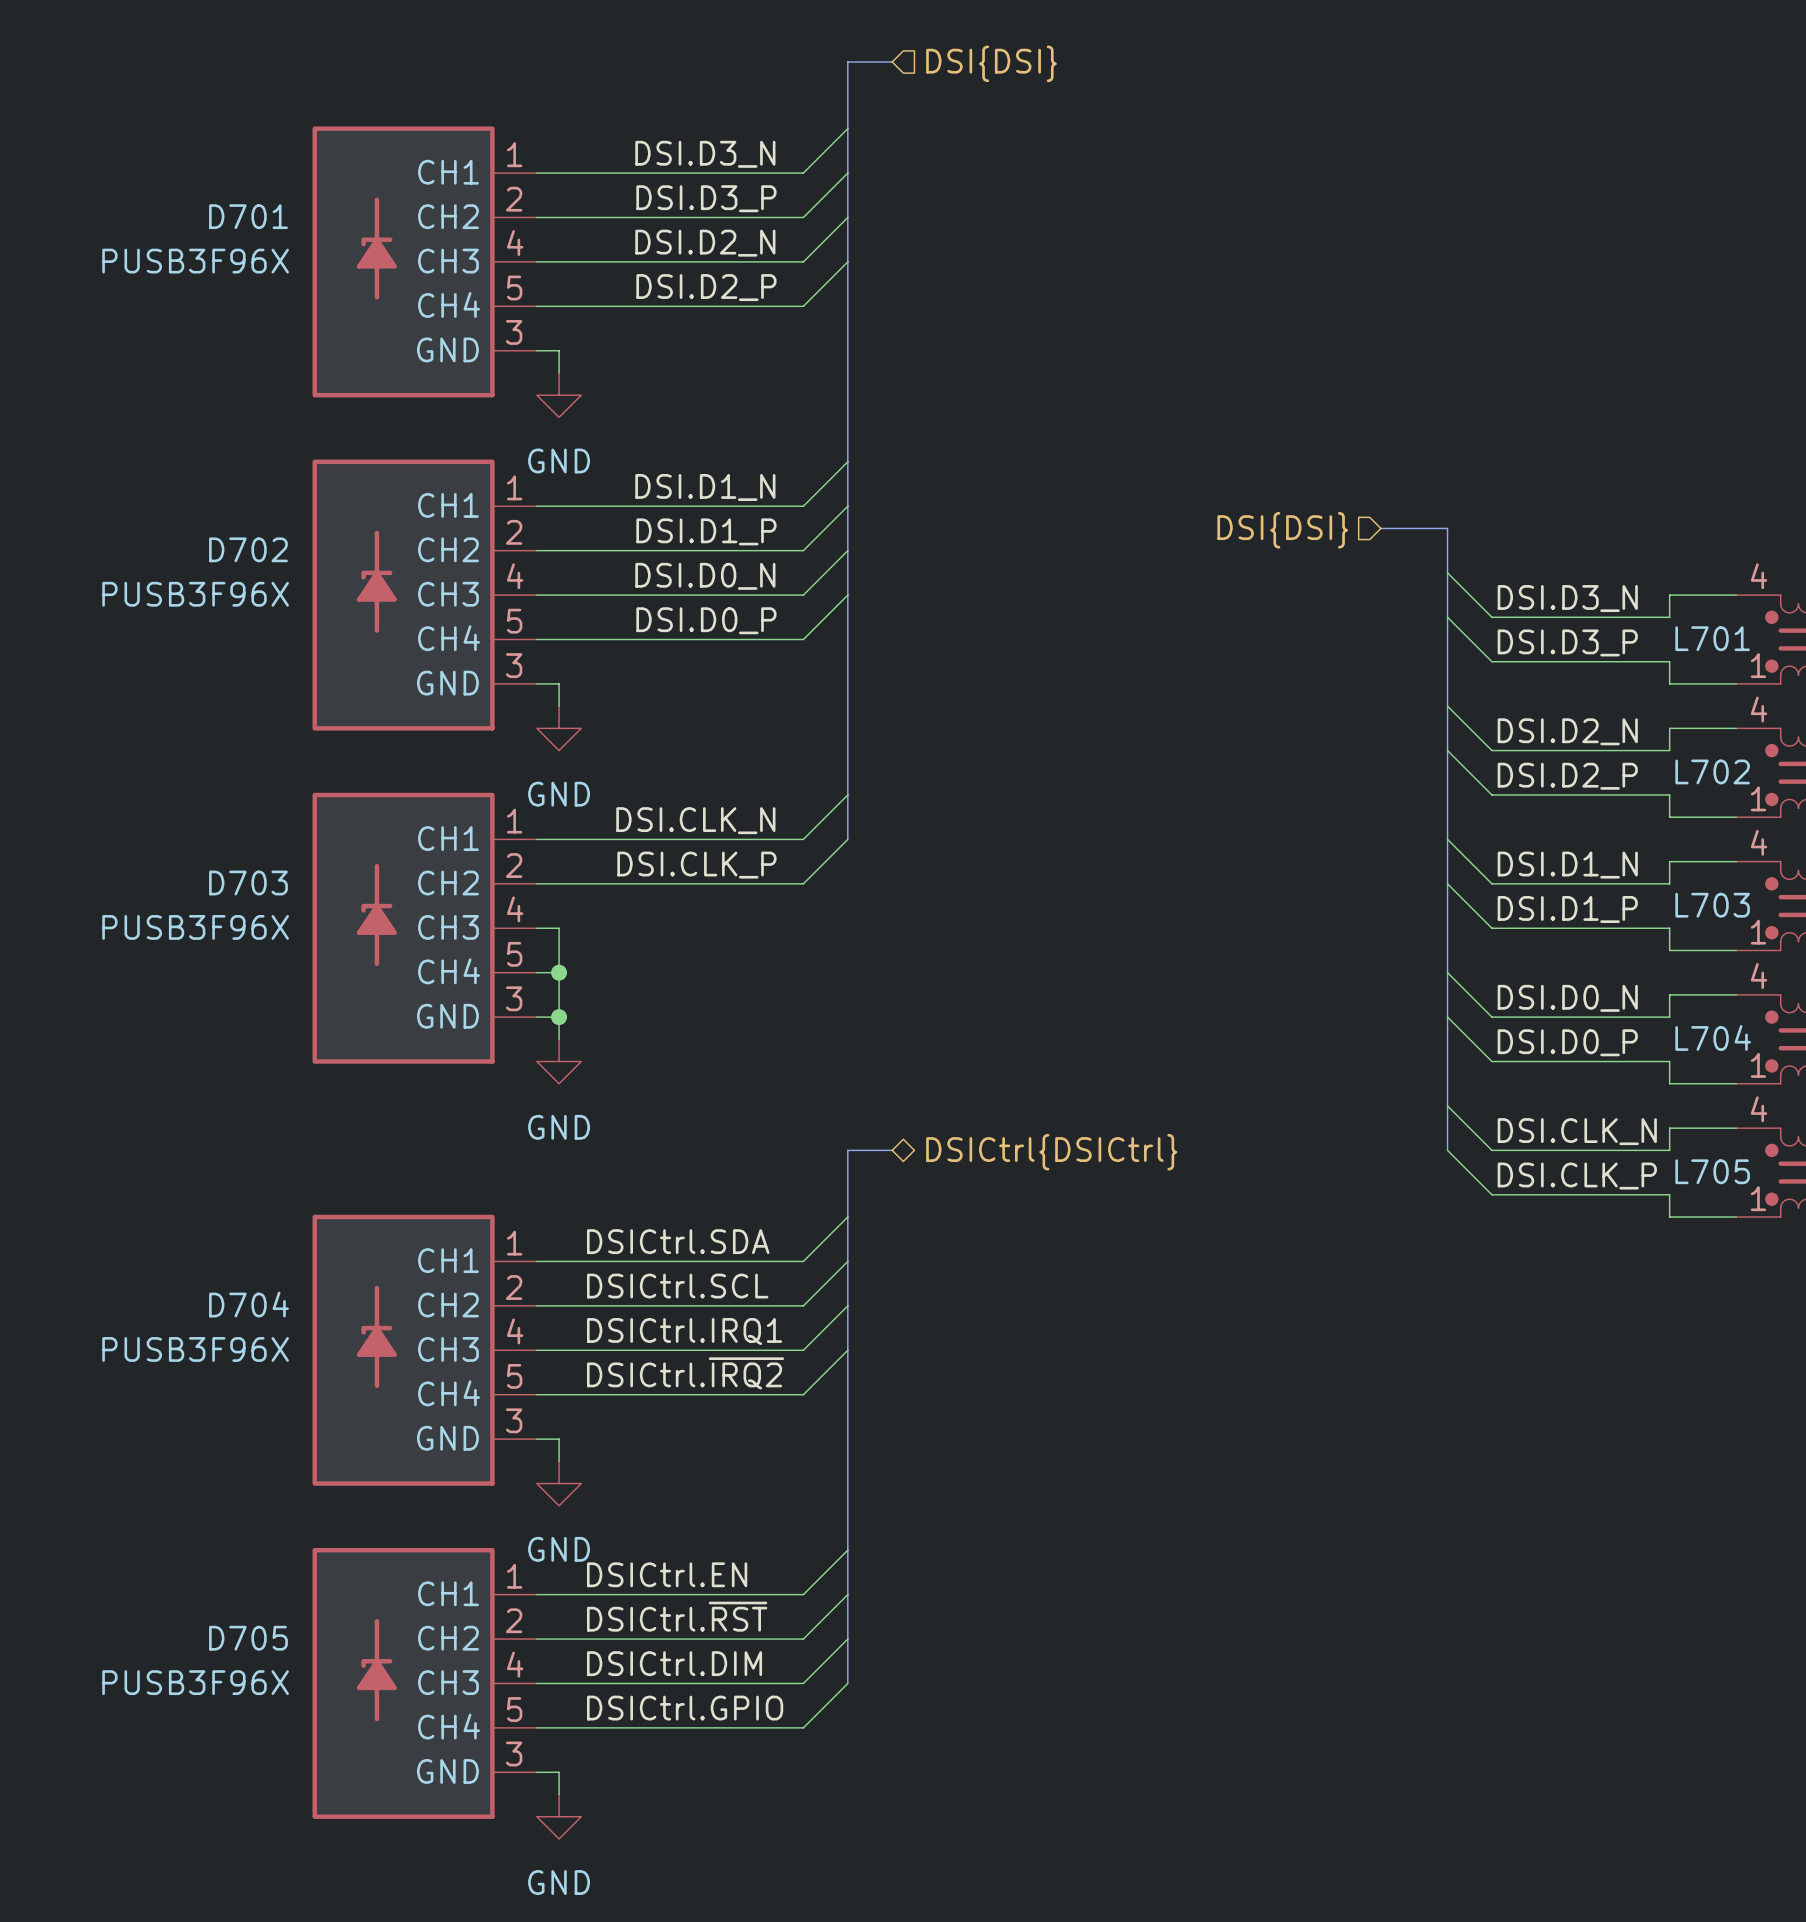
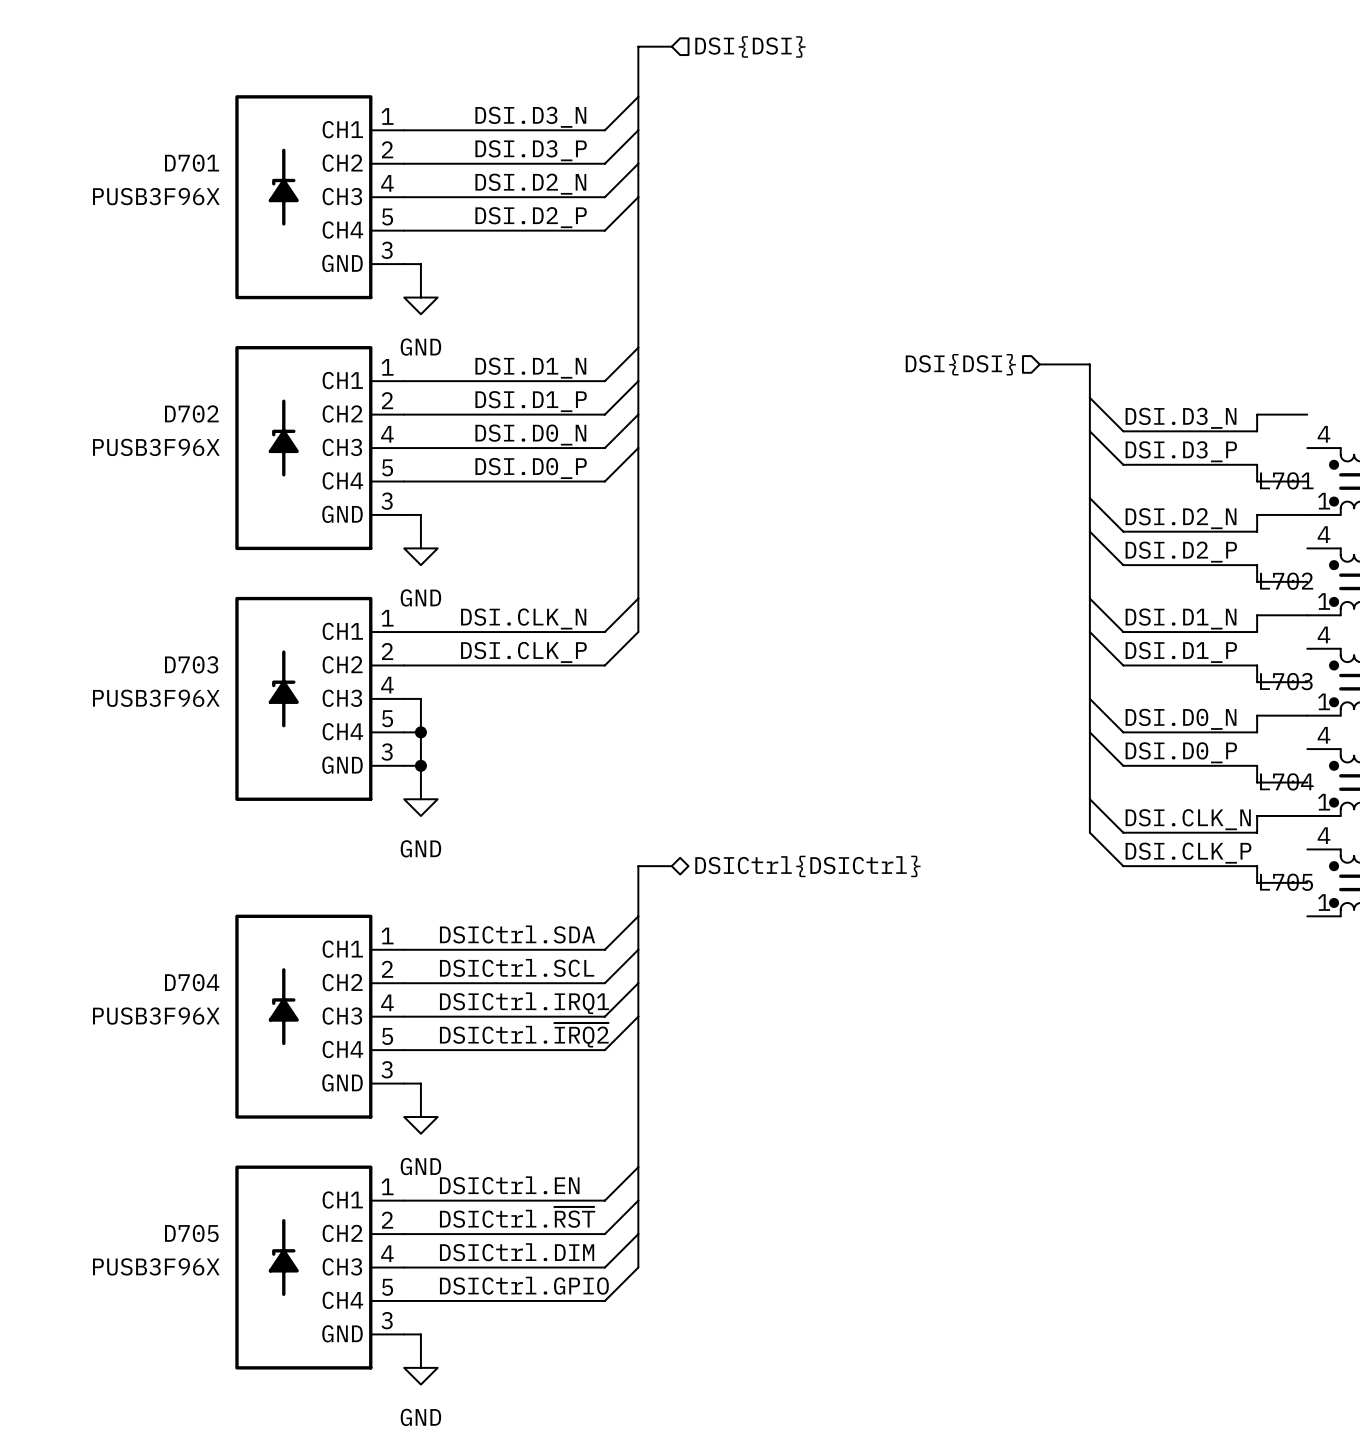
bus: (1380, 528) (1447, 528) -> (1039, 364) (1089, 364) (1089, 397)
wire: none -> (1089, 397) (1123, 431) (1257, 431) (1257, 414) (1307, 414)
hierarchical label position: DSI{DSI} (1282, 530) -> DSI{DSI} (960, 364)
label: none -> DSI.D3_N (1181, 418)
wire: (1736, 595) (1669, 595) (1669, 617) -> (1307, 481) (1257, 481) (1257, 464)
label: DSI.D3_N (1567, 598) -> DSI.D3_P (1181, 451)
wire: (1447, 617) (1491, 661) (1669, 661) (1669, 683) -> (1089, 498) (1123, 531) (1257, 531) (1257, 514)
label: DSI.D3_P (1567, 642) -> DSI.D2_N (1181, 518)
wire: (1736, 728) (1669, 728) (1669, 750) -> (1307, 581) (1257, 581) (1257, 565)
label: DSI.D2_N (1567, 731) -> DSI.D2_P (1181, 552)
wire: (1447, 750) (1491, 794) (1669, 794) (1669, 817) -> (1089, 598) (1123, 632) (1257, 632) (1257, 615)
label: DSI.D2_P (1567, 776) -> DSI.D1_N (1181, 618)
wire: (1736, 861) (1669, 861) (1669, 883) -> (1307, 682) (1257, 682) (1257, 665)
label: DSI.D1_N (1567, 865) -> DSI.D1_P (1181, 652)
wire: (1447, 883) (1491, 928) (1669, 928) (1669, 950) -> (1089, 698) (1123, 732) (1257, 732) (1257, 715)
label: DSI.D1_P (1567, 909) -> DSI.D0_N (1181, 719)
wire: (1736, 994) (1669, 994) (1669, 1017) -> (1307, 782) (1257, 782) (1257, 765)
label: DSI.D0_N (1567, 998) -> DSI.D0_P (1181, 752)
wire: (1447, 1017) (1491, 1061) (1669, 1061) (1669, 1083) -> (1089, 799) (1123, 832) (1257, 832) (1257, 815)
label: DSI.D0_P (1567, 1042) -> none
label: none -> DSI.CLK_N (1188, 819)
bus: (1447, 1105) (1447, 1150) -> none
wire: (1736, 1128) (1669, 1128) (1669, 1150) -> (1307, 882) (1257, 882) (1257, 866)
label: DSI.CLK_N (1577, 1131) -> DSI.CLK_P (1188, 853)
wire: (1447, 1150) (1491, 1194) (1669, 1194) (1669, 1217) (1736, 1217) -> none
label: DSI.CLK_P (1577, 1176) -> none

